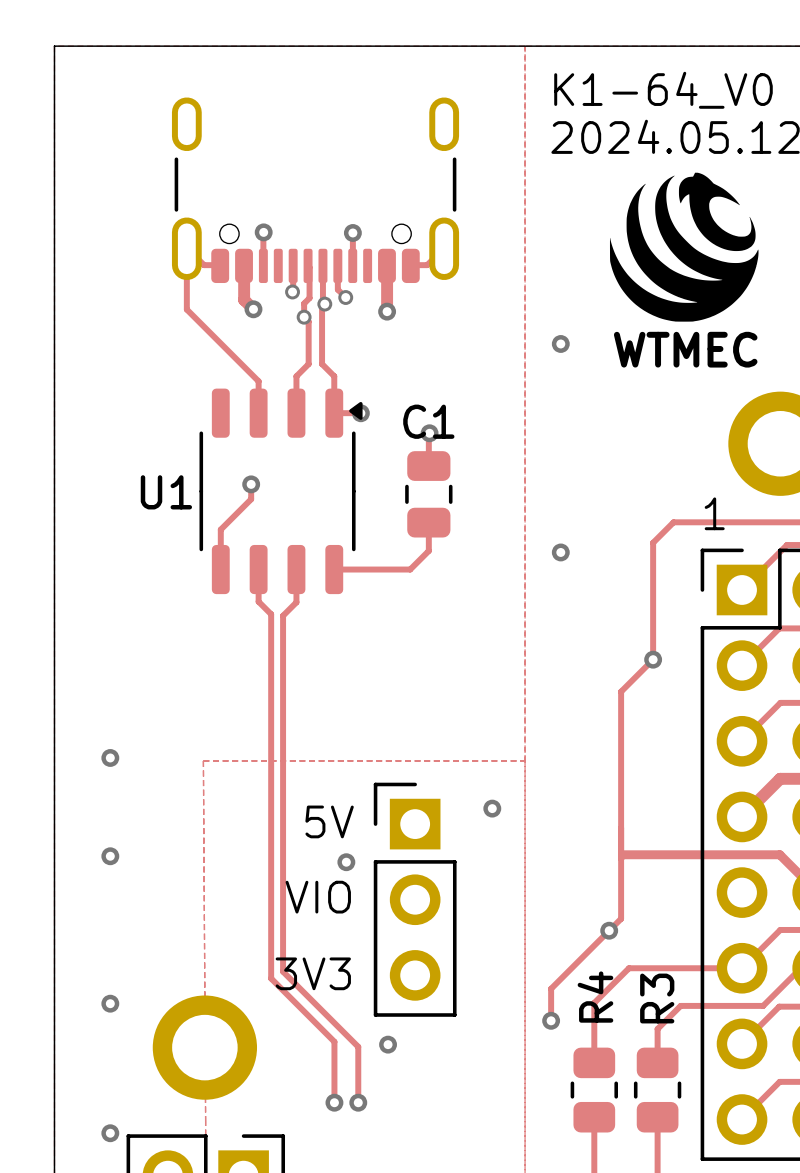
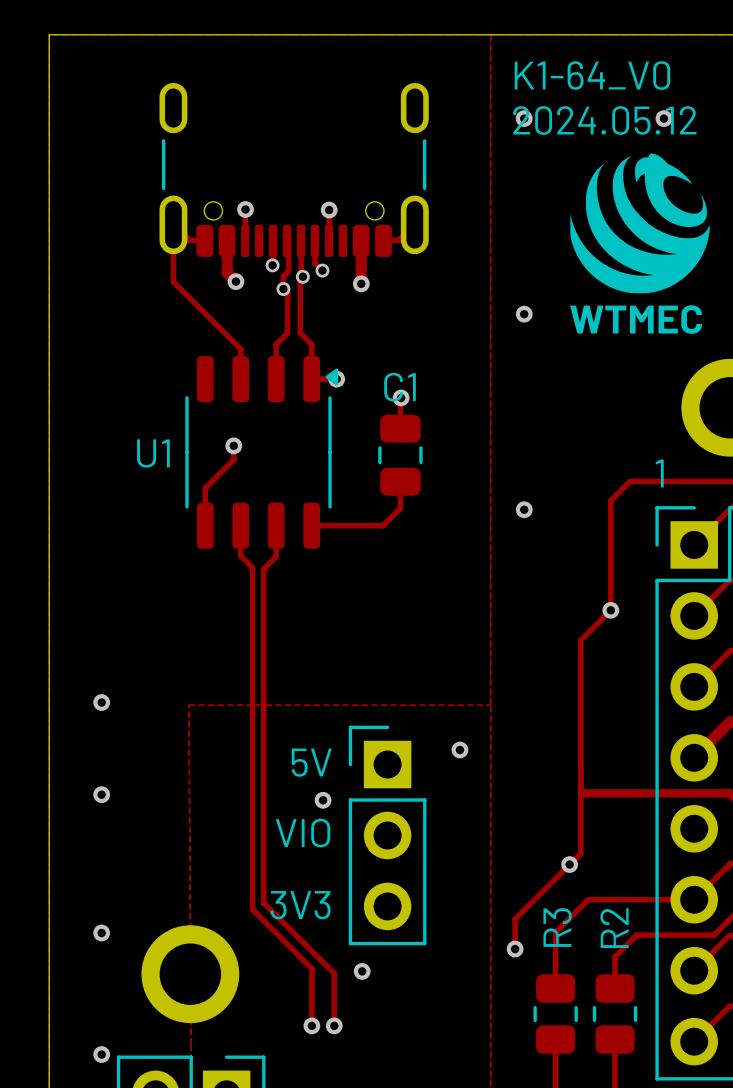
via: none -> (524, 118)
via: none -> (663, 118)
R4 name: R4 (595, 997) -> R3 (557, 927)
R3 name: R3 (657, 998) -> R2 (614, 928)

